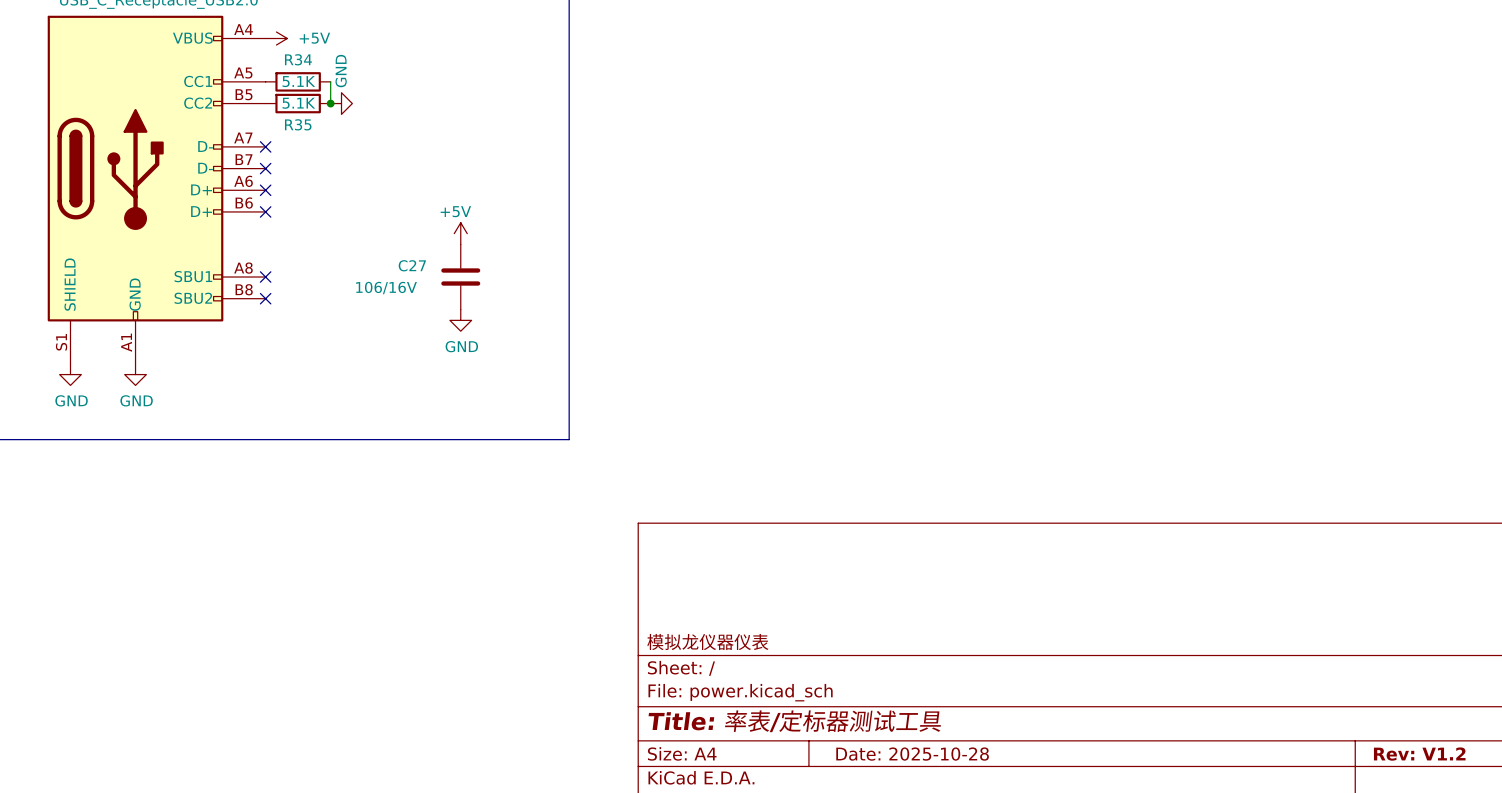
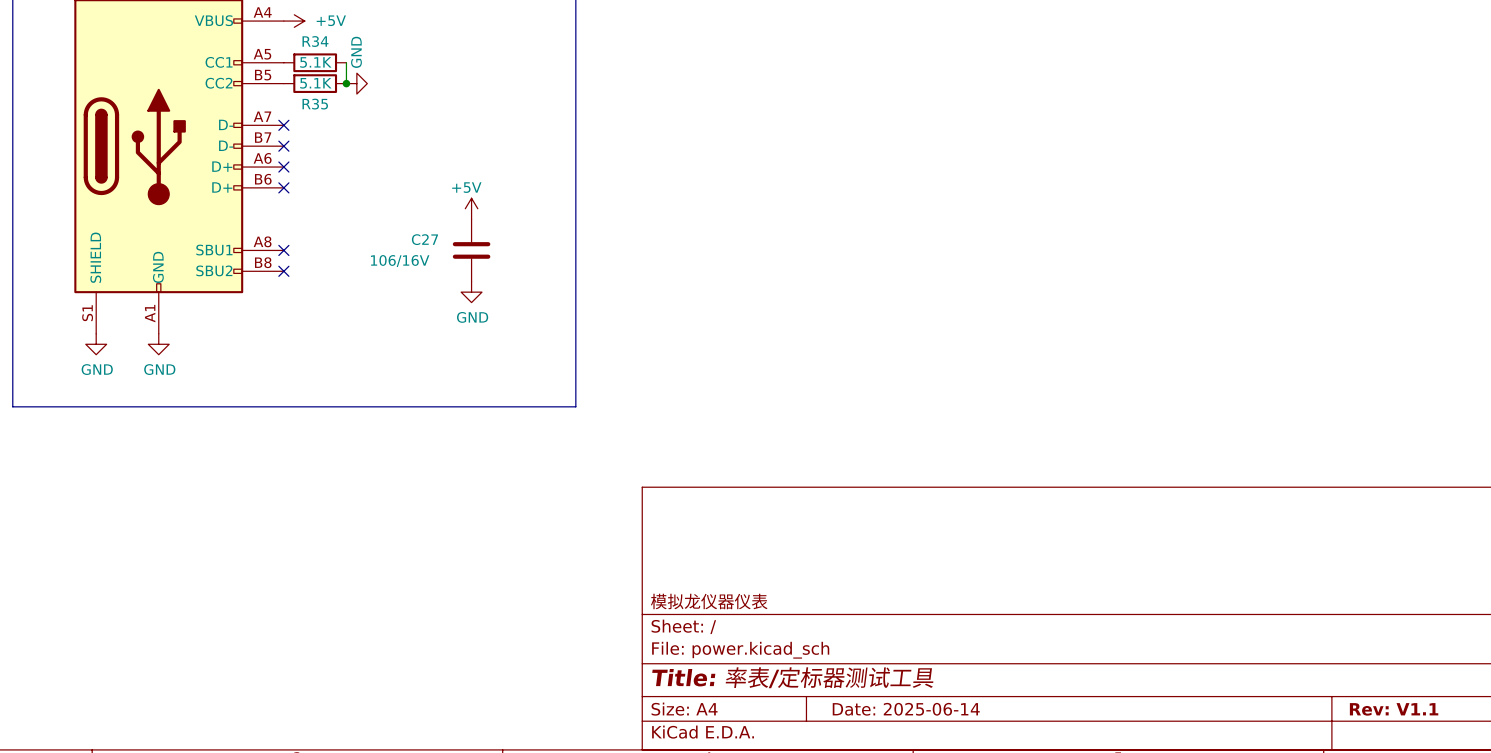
title block: Date: 2025-10-28 (912, 754) -> Date: 2025-06-14 (906, 709)
title block: Rev: V1.2 (1419, 754) -> Rev: V1.1 (1394, 709)

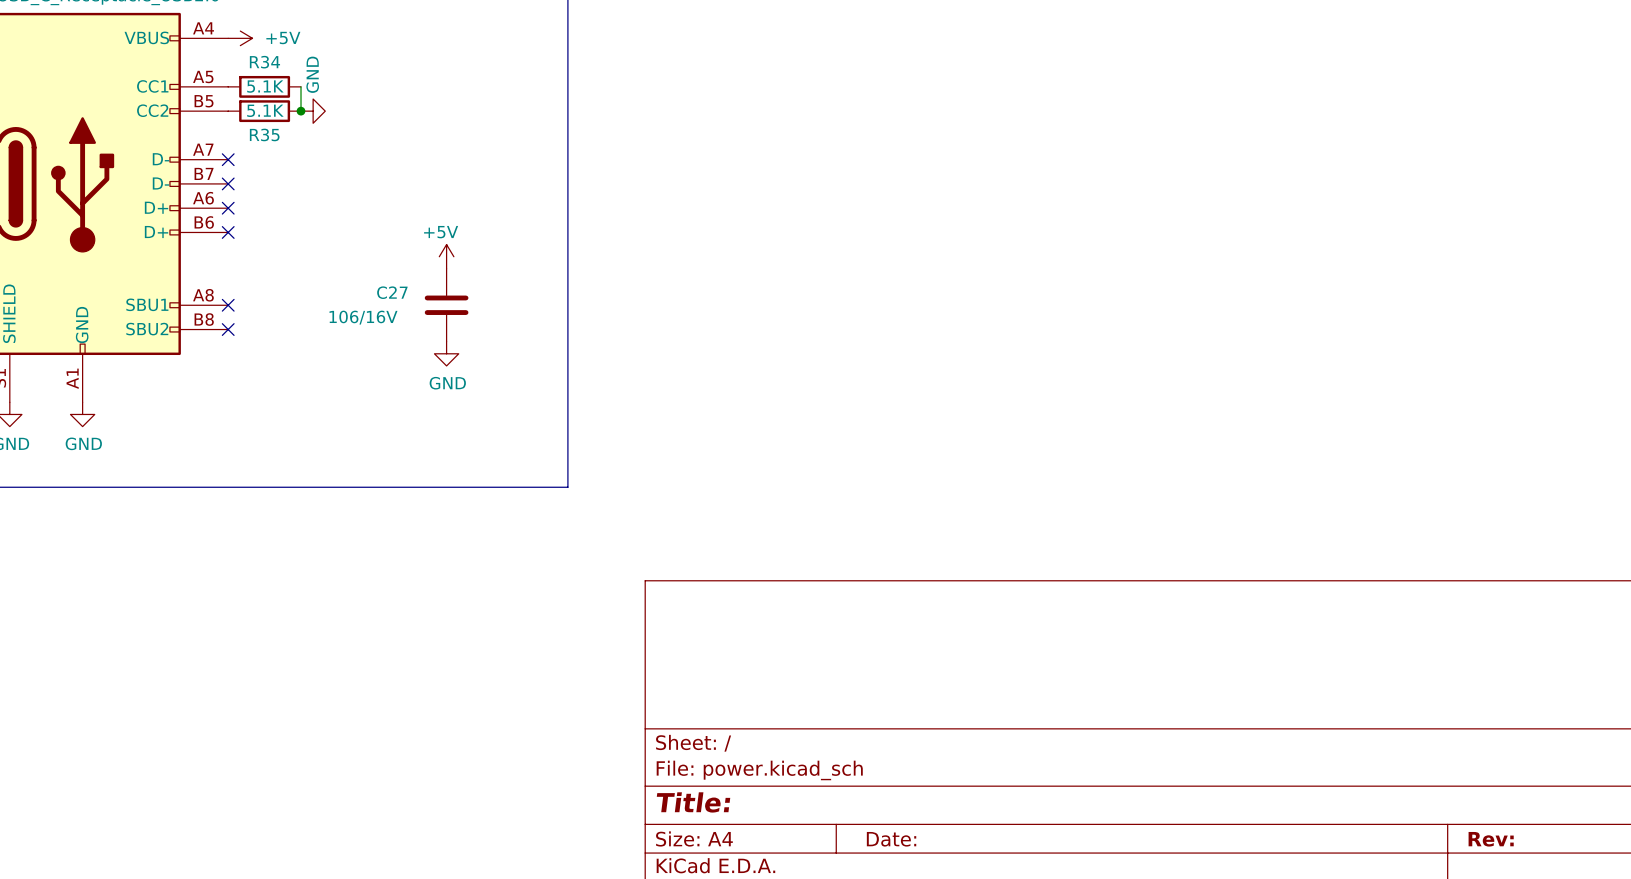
title block: 模拟龙仪器仪表 (709, 601) -> none
title block: Title: 率表/定标器测试工具 (792, 677) -> Title: (693, 802)
title block: Date: 2025-06-14 (906, 709) -> Date: (891, 839)
title block: Rev: V1.1 (1394, 709) -> Rev: (1491, 839)

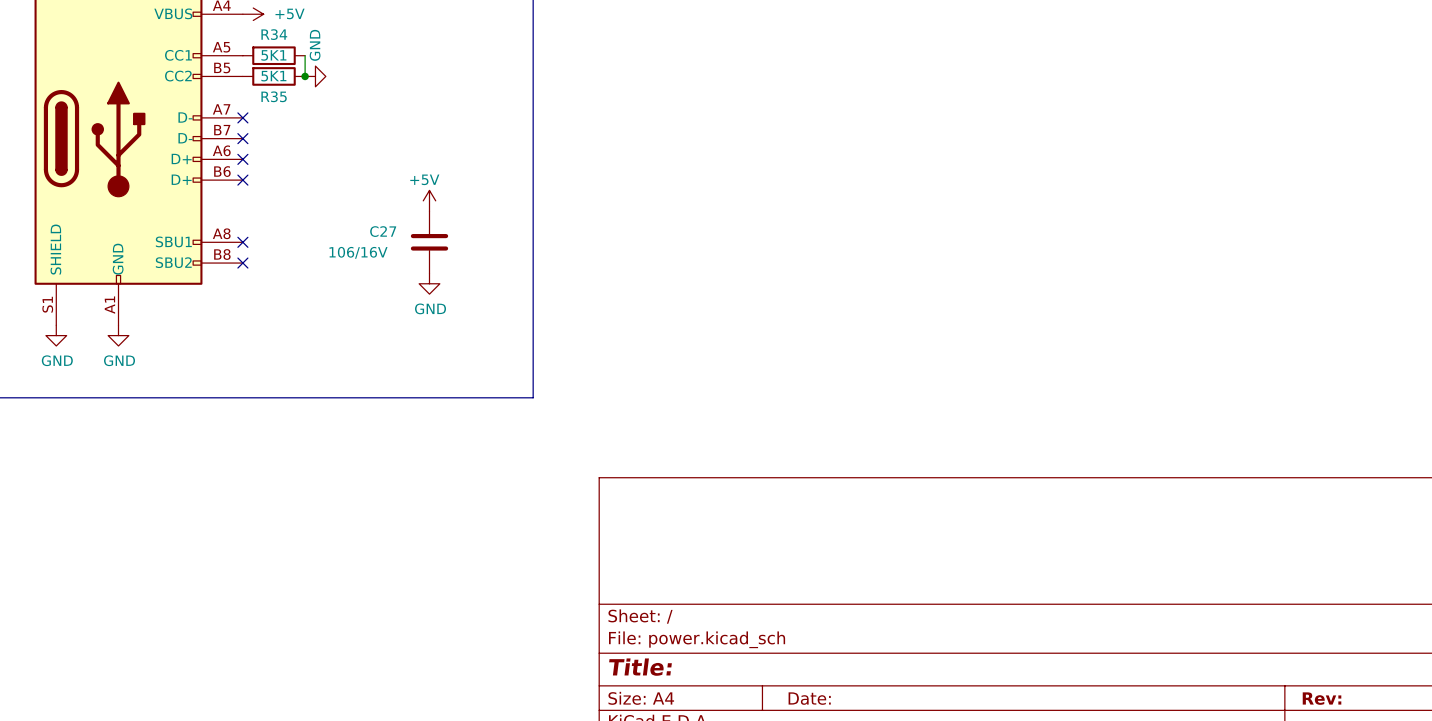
R34 value: 5.1K (265, 86) -> 5K1 (273, 55)
R35 value: 5.1K (265, 110) -> 5K1 (273, 76)

